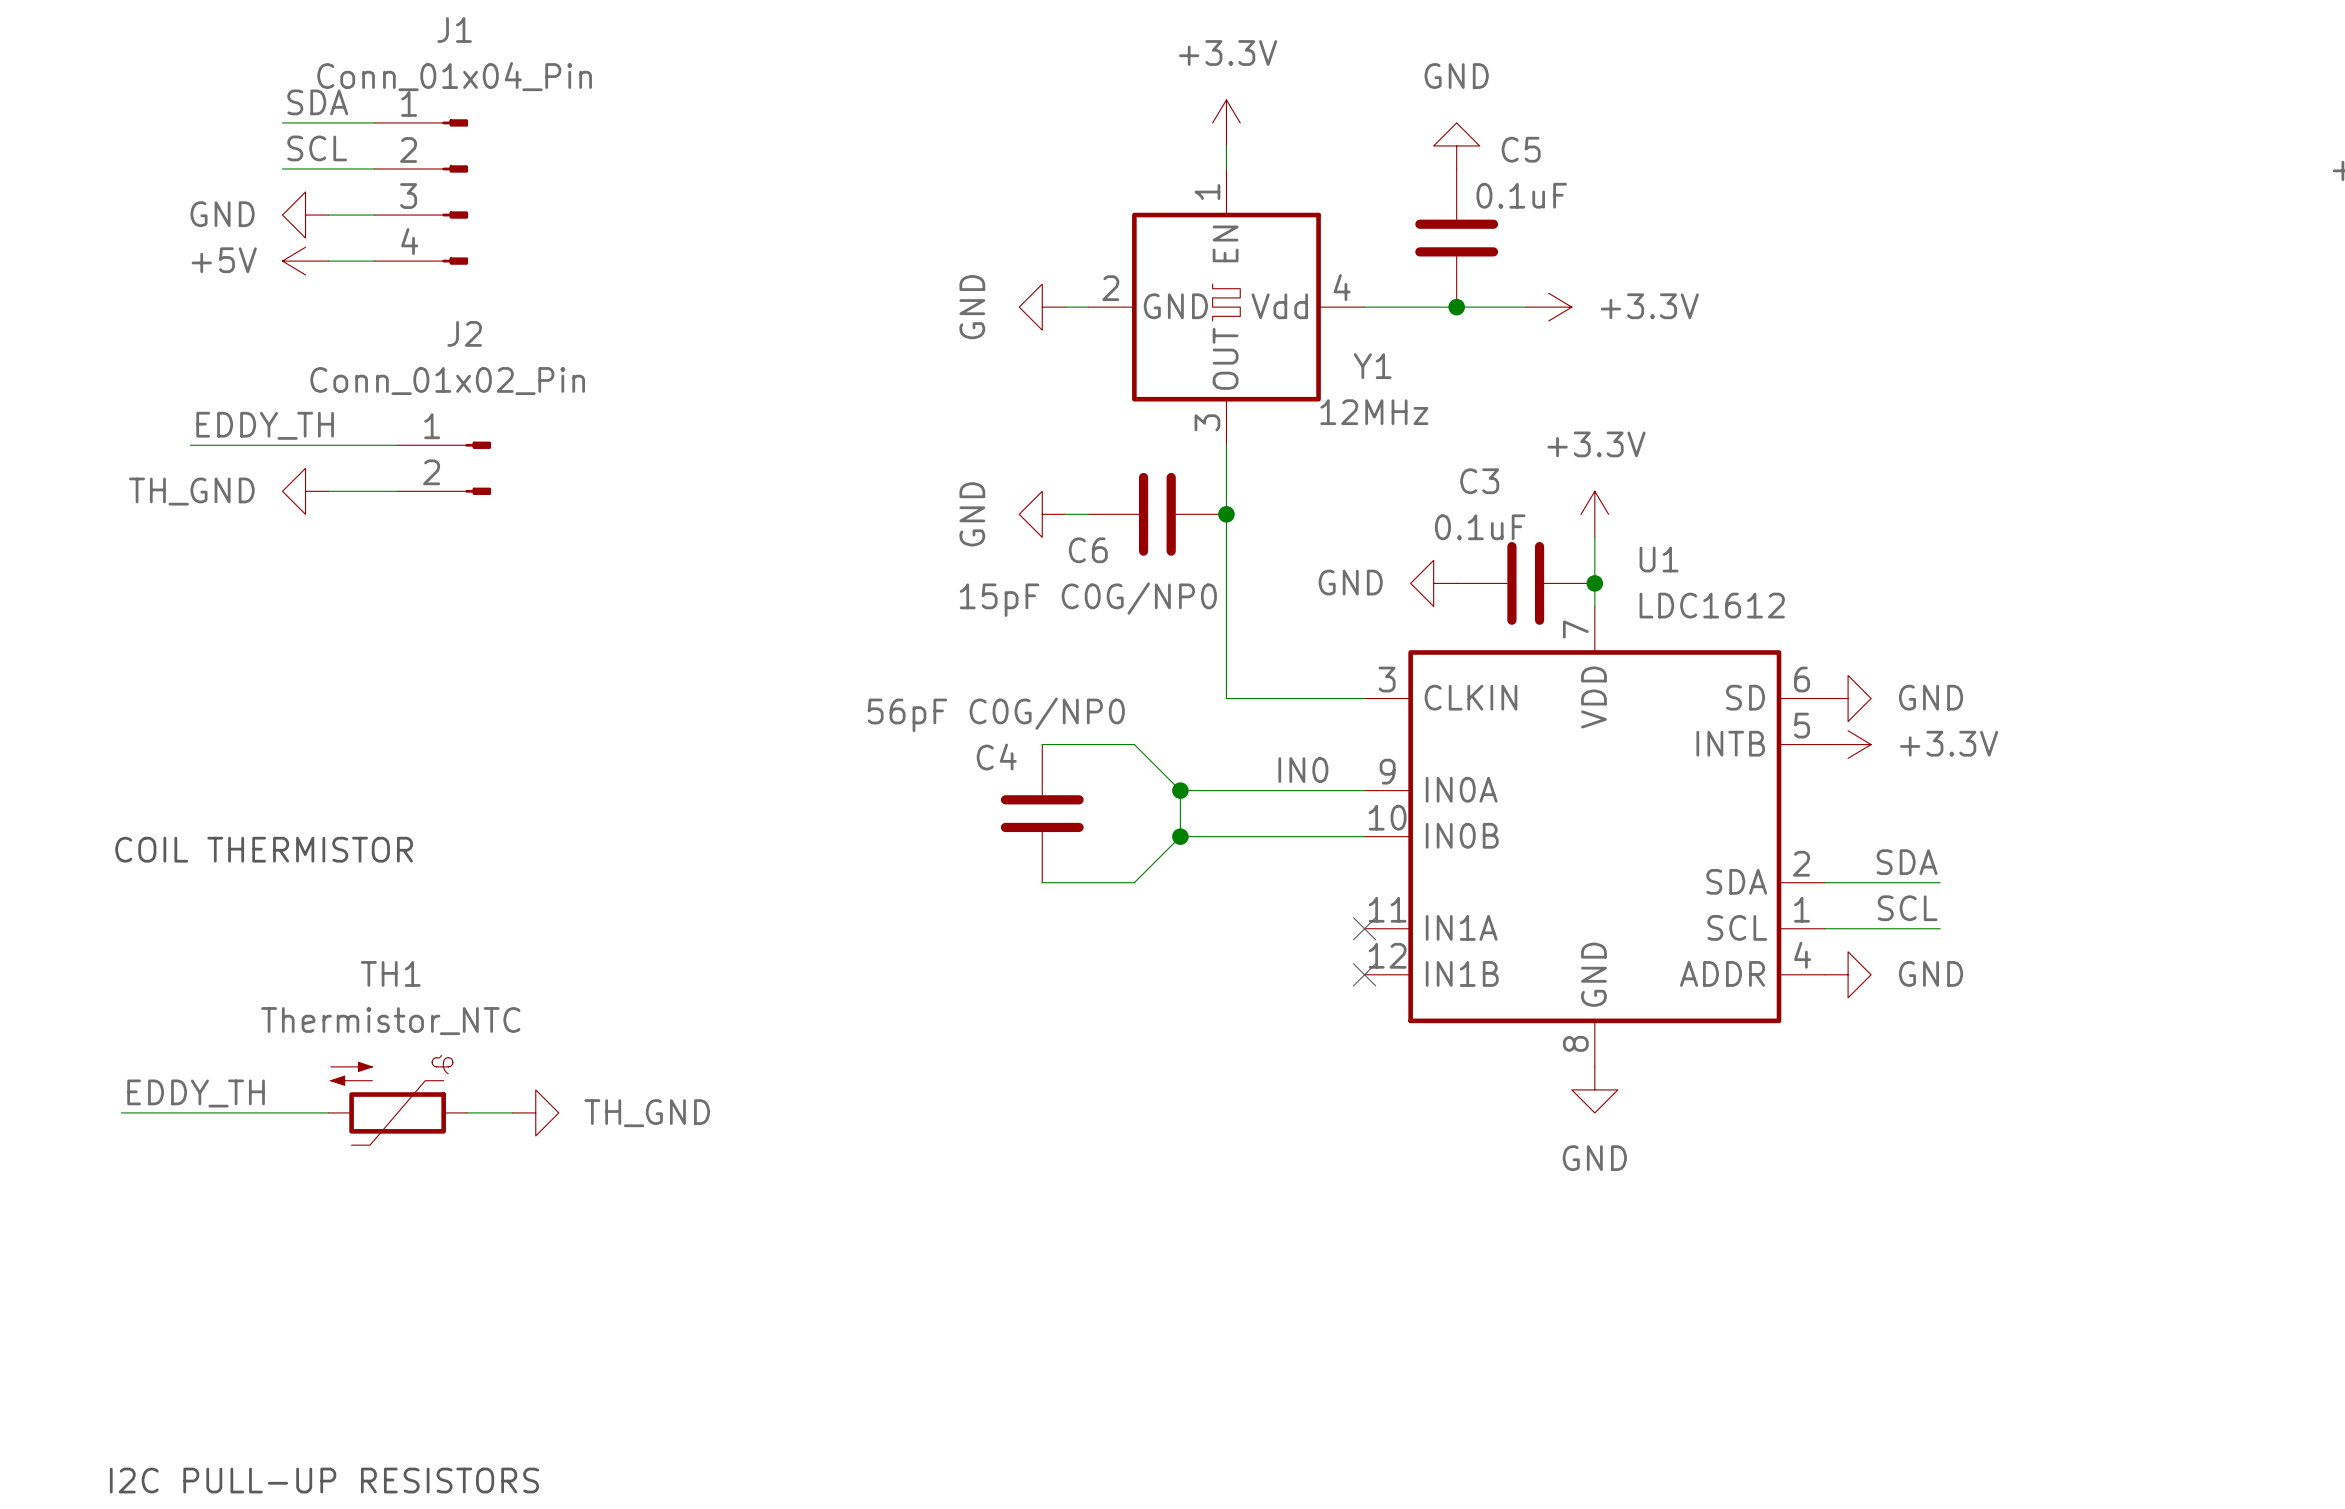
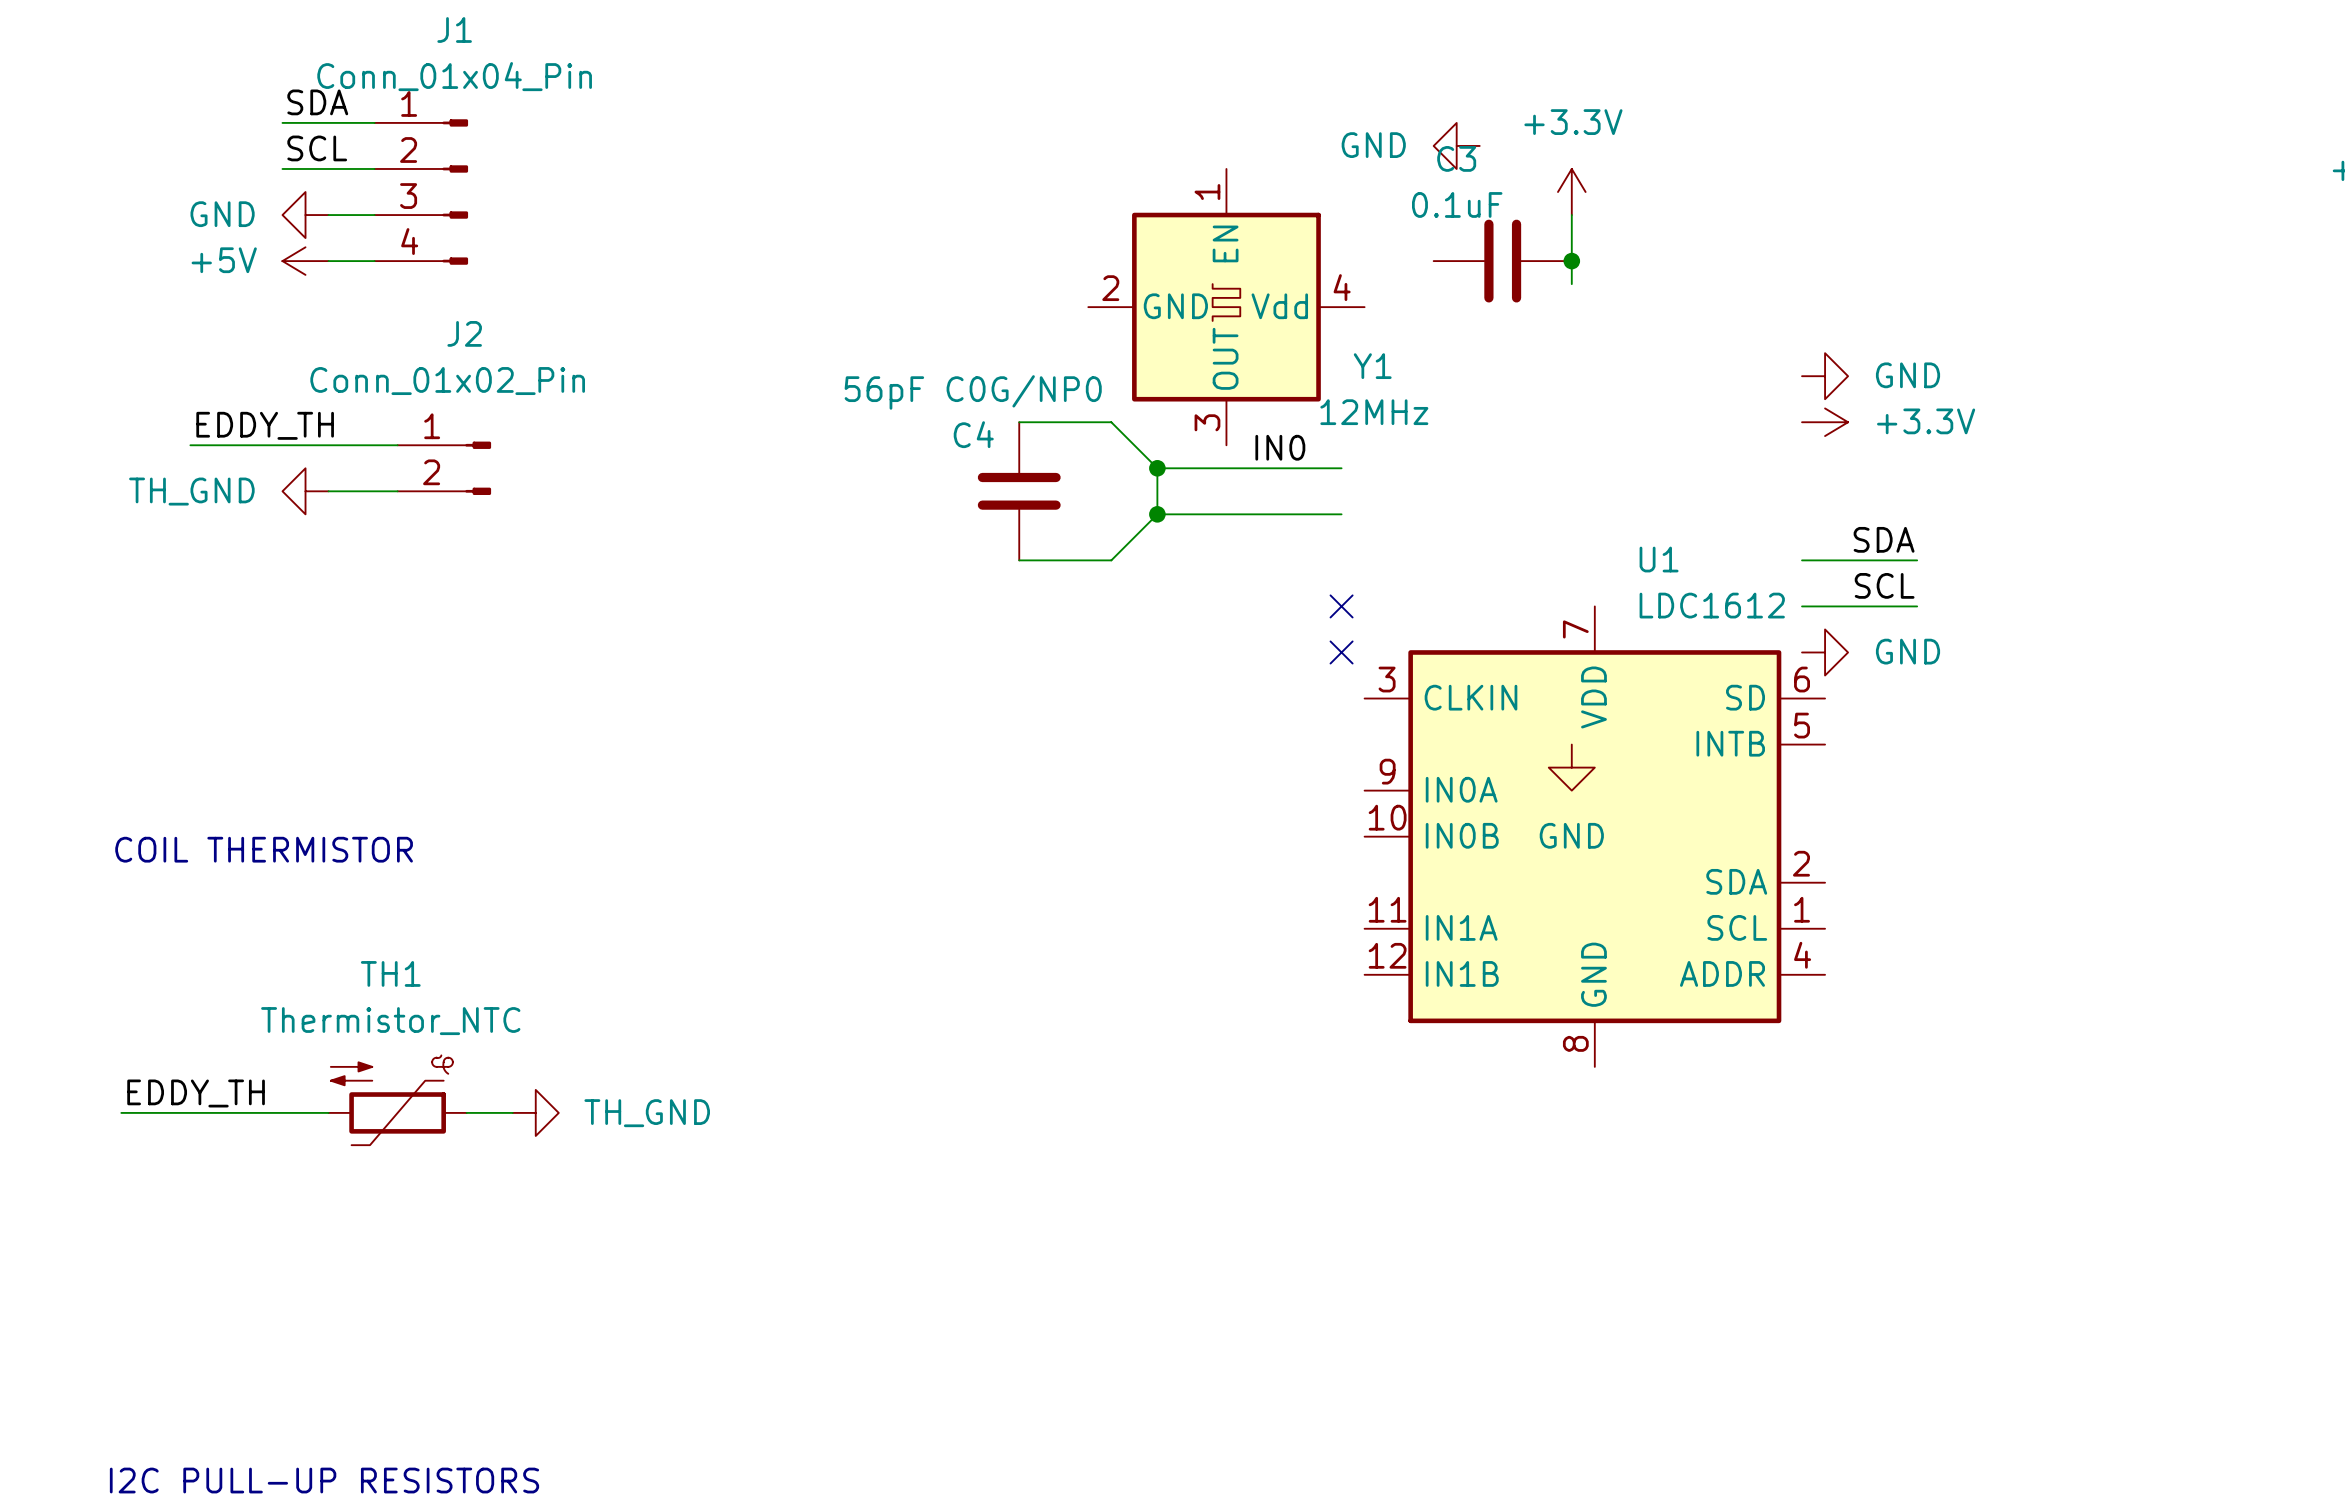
power symbol: +3.3V (1226, 122) -> none
wire: (1226, 145) (1226, 168) -> none
power symbol rotation: 0° (1456, 145) -> 90° counterclockwise (1456, 145)
C5: 0.1uF (1456, 238) -> none
junction: none -> (1571, 261)
power symbol text position: +3.3V (1649, 306) -> +3.3V (1573, 122)
power symbol: GND (1042, 307) -> none
wire: (1065, 307) (1088, 307) -> none
wire: (1364, 307) (1525, 307) -> none
junction: (1456, 307) -> none
power symbol rotation: 0° (1548, 307) -> 90° counterclockwise (1571, 192)
power symbol position: +3.3V (1548, 307) -> +3.3V (1571, 192)
power symbol: none -> GND (1825, 376)
power symbol: none -> +3.3V (1825, 422)
wire: (1226, 445) (1226, 698) (1364, 698) -> none
junction: none -> (1157, 468)
power symbol: GND (1042, 514) -> none
wire: (1065, 514) (1088, 514) -> none
junction: none -> (1157, 514)
C6: 15pF C0G/NP0 (1157, 514) -> none
junction: (1226, 514) -> none
power symbol: +3.3V (1594, 514) -> none
wire: (1594, 537) (1594, 606) -> (1571, 215) (1571, 284)
power symbol: GND (1433, 583) -> none
C3 position: (1525, 583) -> (1502, 261)
junction: (1594, 583) -> none
no-connect mark: none -> (1341, 606)
no-connect mark: none -> (1341, 652)
power symbol position: GND (1848, 698) -> GND (1825, 652)
wire: (1042, 744) (1134, 744) (1180, 790) -> (1019, 422) (1111, 422) (1157, 468)
power symbol: +3.3V (1848, 744) -> none
power symbol: none -> GND (1571, 767)
label position: IN0 (1303, 770) -> IN0 (1280, 447)
wire: (1180, 790) (1364, 790) -> (1157, 468) (1341, 468)
wire: (1180, 790) (1180, 836) -> (1157, 468) (1157, 514)
junction: (1180, 790) -> none
C4 position: (1042, 813) -> (1019, 491)
wire: (1180, 836) (1364, 836) -> (1157, 514) (1341, 514)
wire: (1180, 836) (1134, 882) (1042, 882) -> (1157, 514) (1111, 560) (1019, 560)
junction: (1180, 836) -> none
label position: SDA (1907, 862) -> SDA (1884, 539)
wire: (1825, 882) (1940, 882) -> (1802, 560) (1917, 560)
label position: SCL (1907, 908) -> SCL (1884, 585)
no-connect mark: (1364, 928) -> none
wire: (1825, 928) (1940, 928) -> (1802, 606) (1917, 606)
no-connect mark: (1364, 974) -> none
power symbol: GND (1848, 974) -> none
power symbol: GND (1594, 1089) -> none

